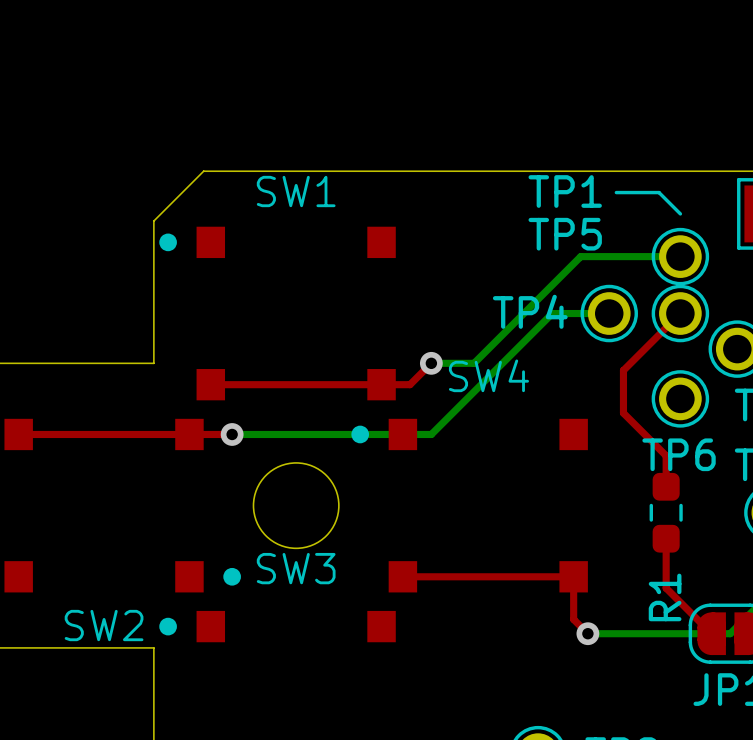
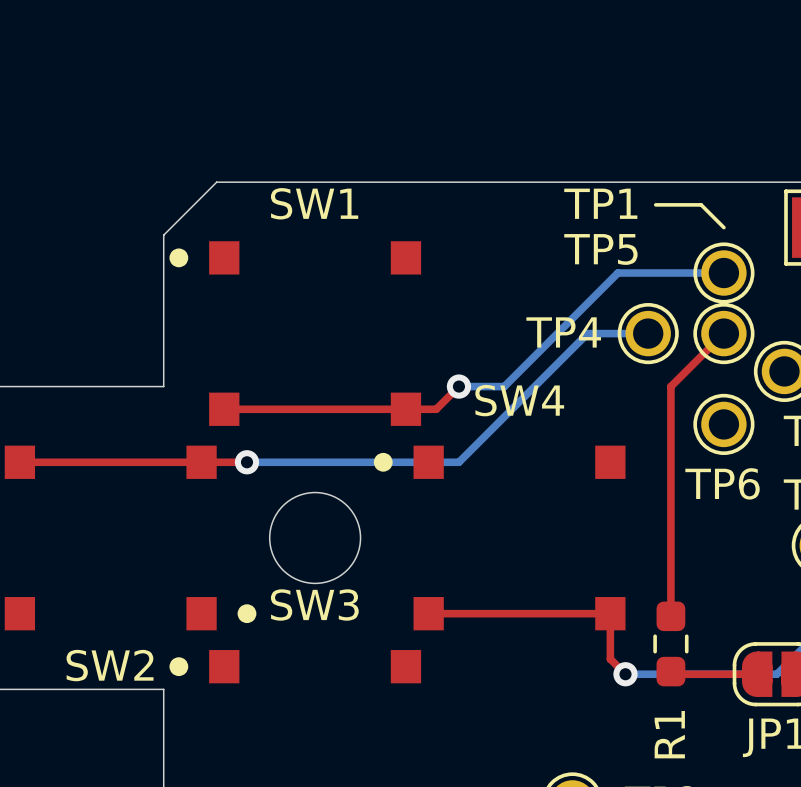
top track: (630, 363) (623, 370) (623, 413) (666, 455) (666, 486) -> (670, 386) (670, 616)
R1 position: (666, 512) -> (670, 643)
top track: (666, 538) (666, 588) (711, 633) -> (670, 671) (673, 674) (757, 674)

